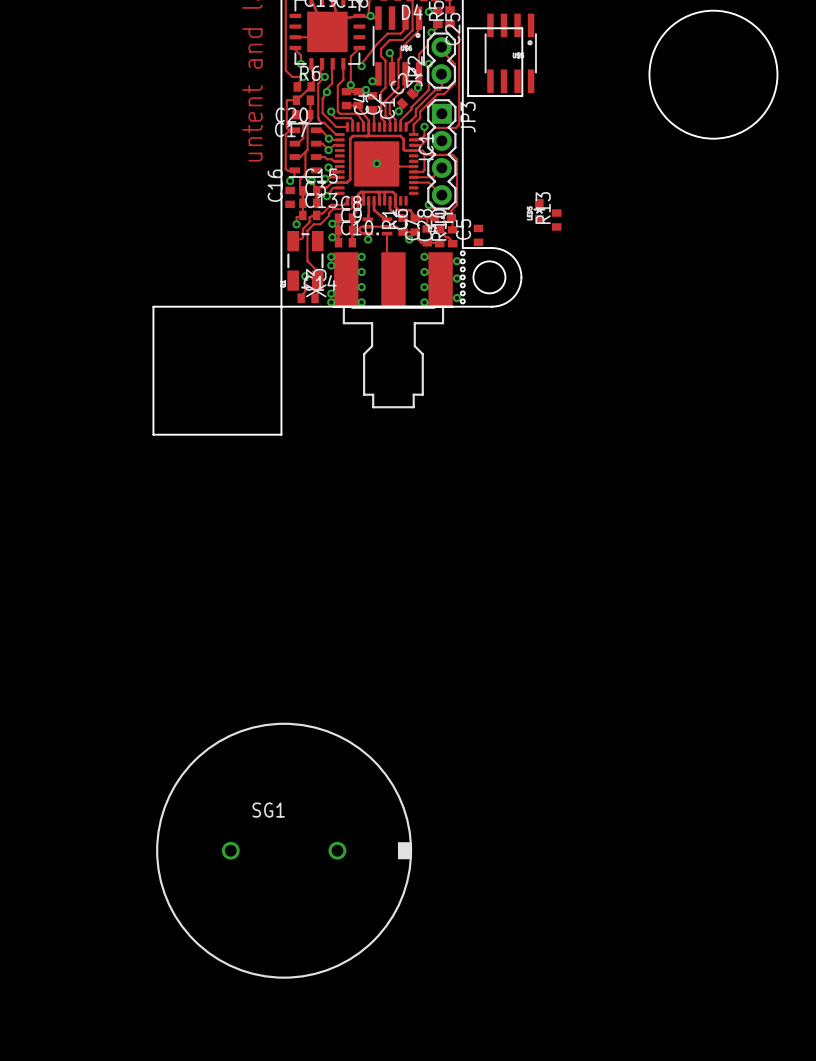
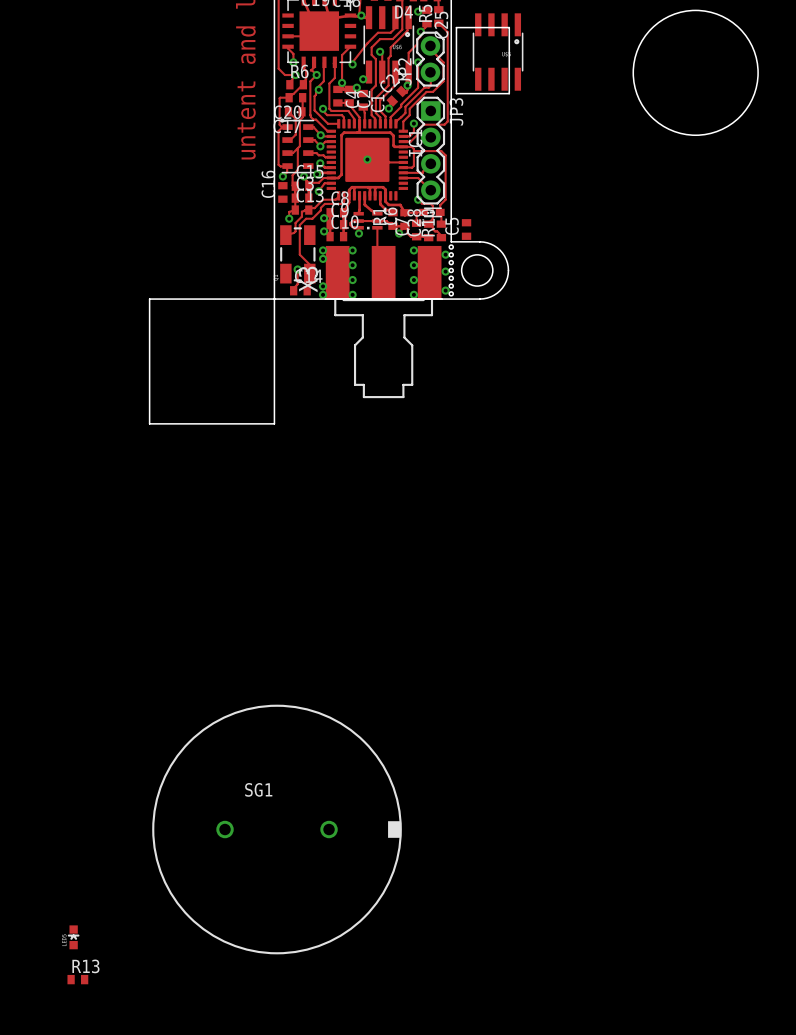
part position: (539, 211) -> (73, 937)
R13 rotation: 0° (556, 220) -> 90° clockwise (77, 979)
R13 position: (556, 220) -> (77, 979)

